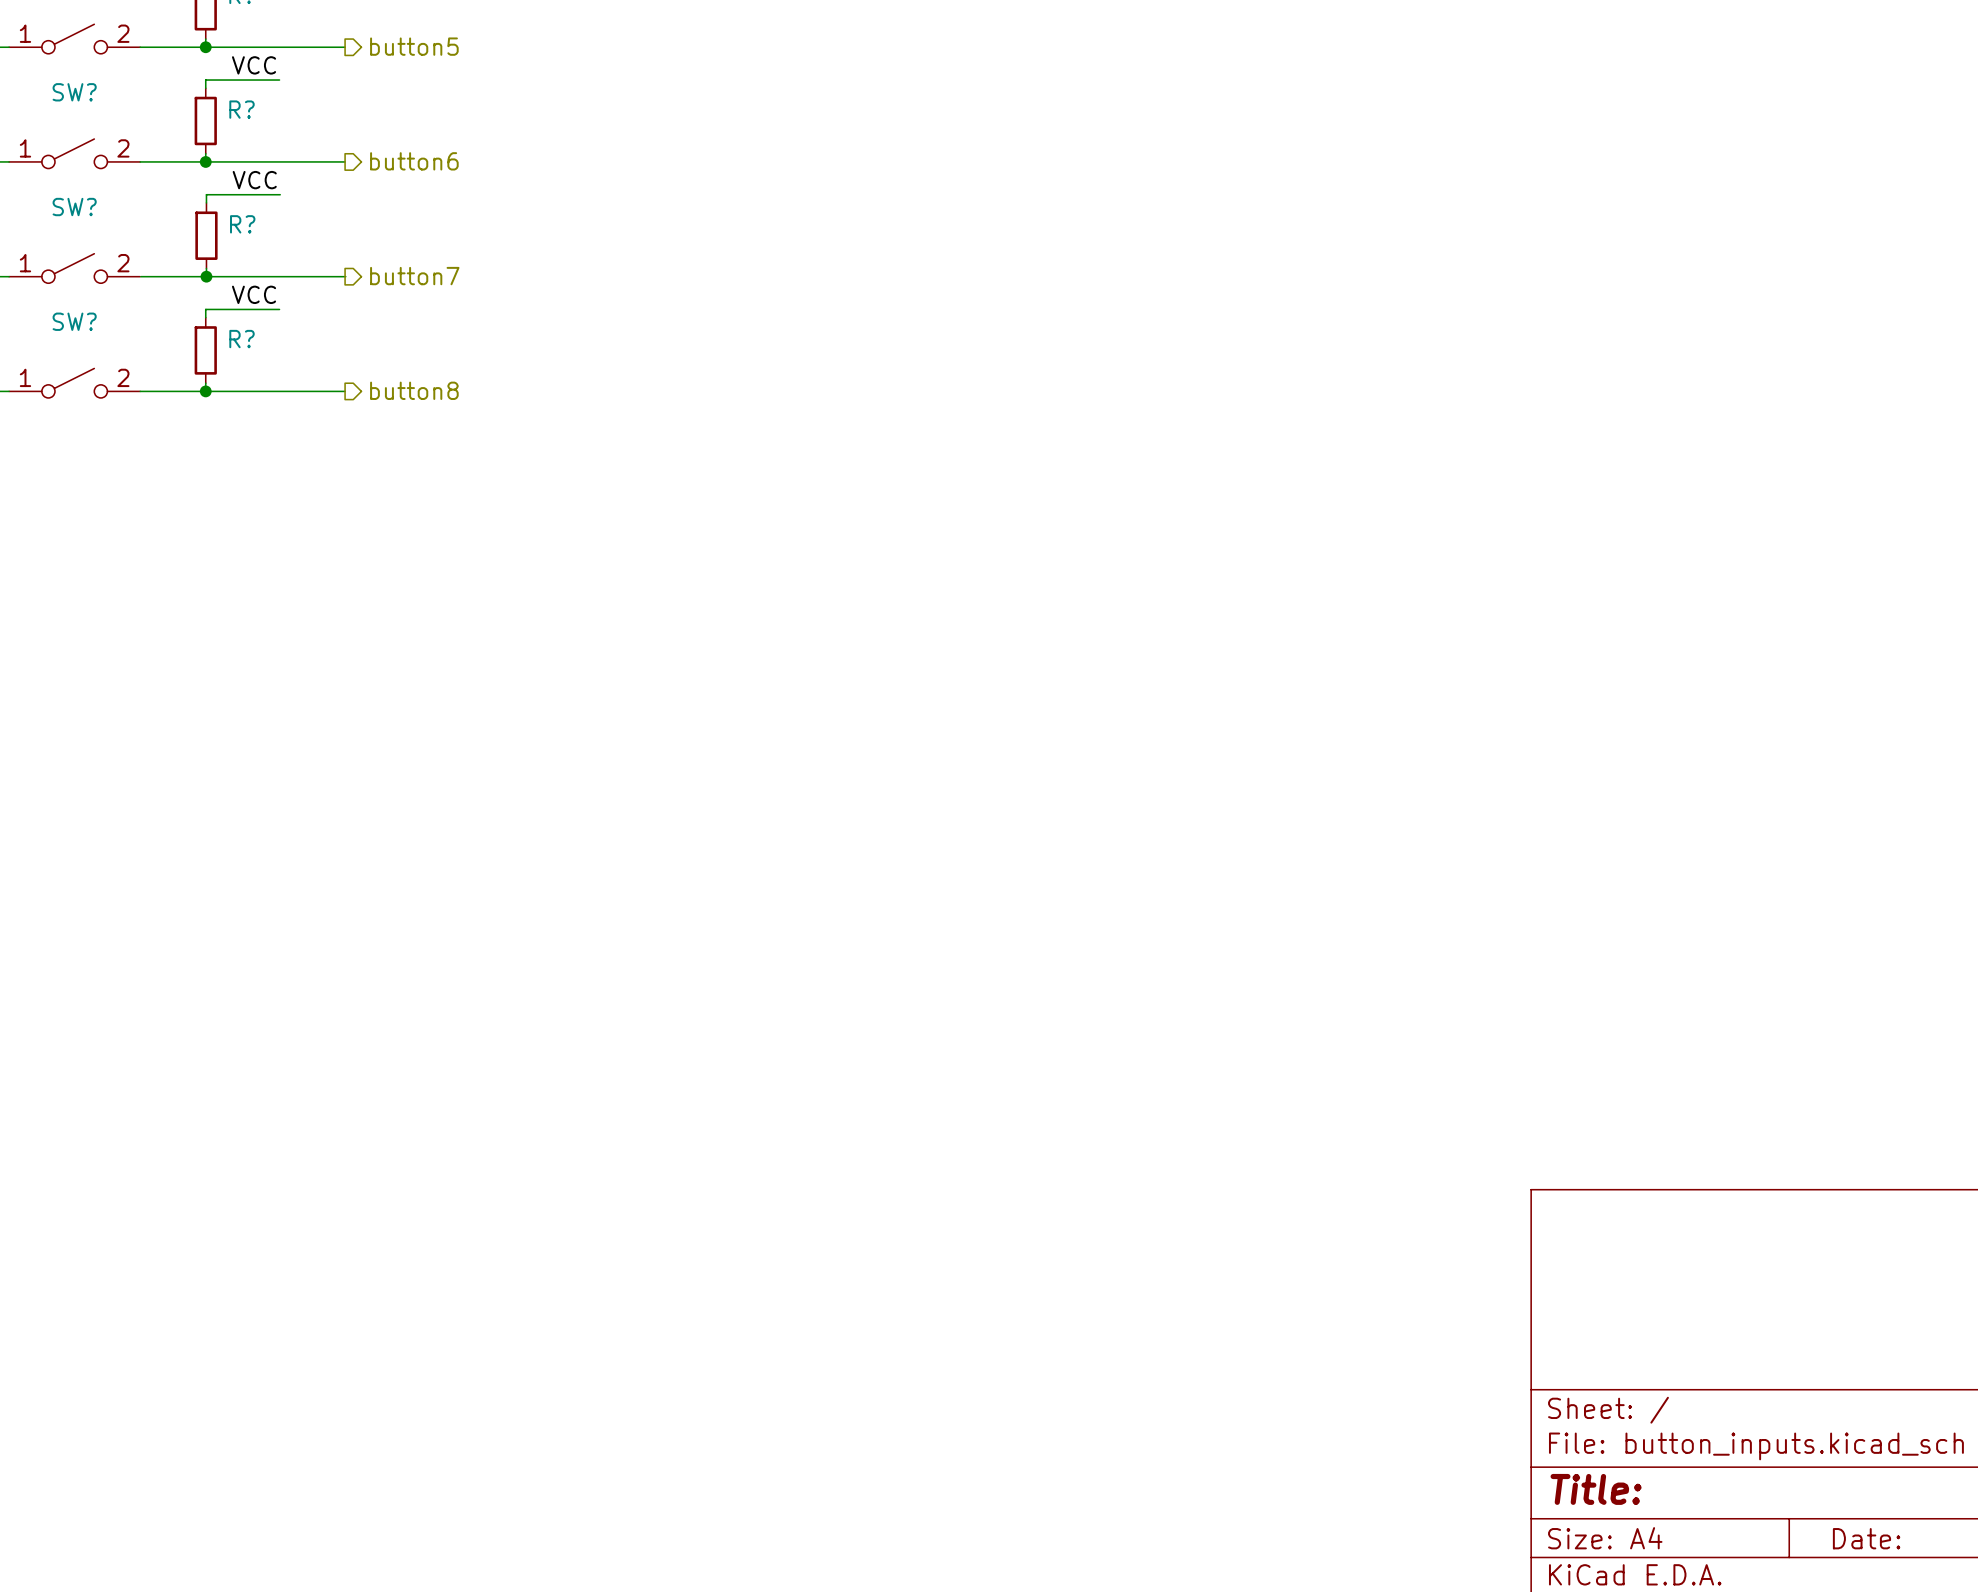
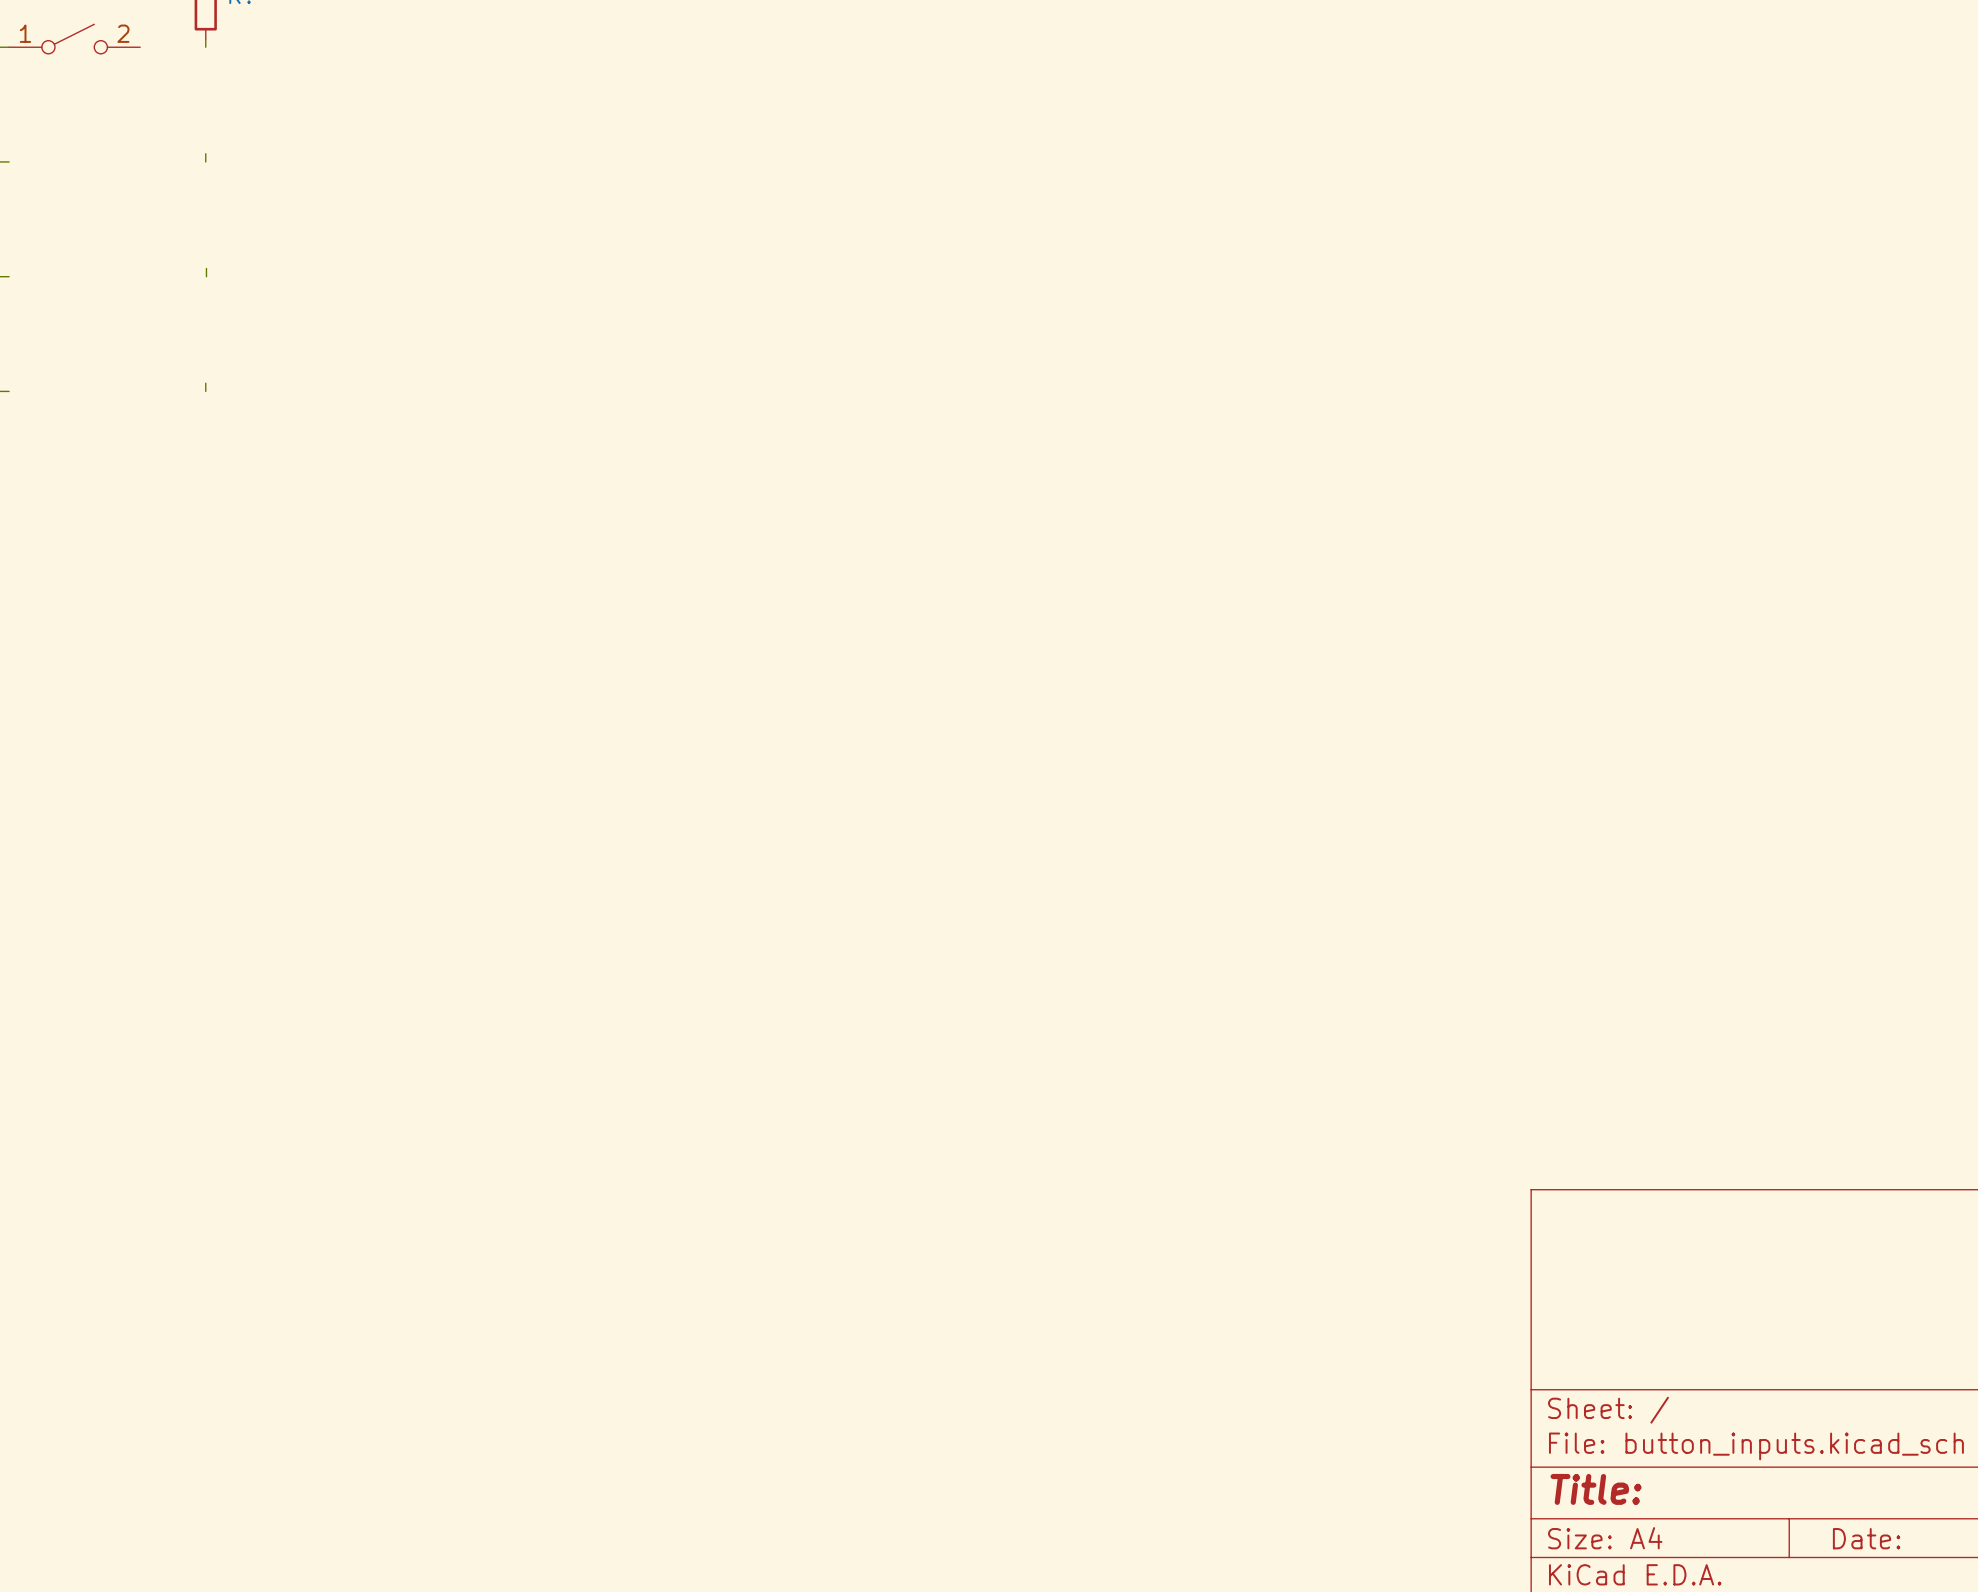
hierarchical label: button5 (414, 46) -> none
wire: (140, 47) (345, 47) -> none
junction: (205, 47) -> none
label: VCC (254, 65) -> none
wire: (279, 80) (205, 80) (205, 88) -> none
R?: (205, 120) -> none
SW?: (74, 153) -> none
wire: (140, 161) (345, 161) -> none
junction: (205, 161) -> none
hierarchical label: button6 (414, 161) -> none
label: VCC (254, 180) -> none
wire: (280, 194) (206, 194) (206, 202) -> none
R?: (206, 235) -> none
SW?: (74, 268) -> none
wire: (140, 276) (345, 276) -> none
junction: (206, 276) -> none
hierarchical label: button7 (414, 276) -> none
label: VCC (254, 294) -> none
wire: (279, 309) (205, 309) (205, 317) -> none
R?: (205, 350) -> none
SW?: (74, 383) -> none
hierarchical label: button8 (414, 390) -> none
wire: (140, 391) (345, 391) -> none
junction: (205, 391) -> none

